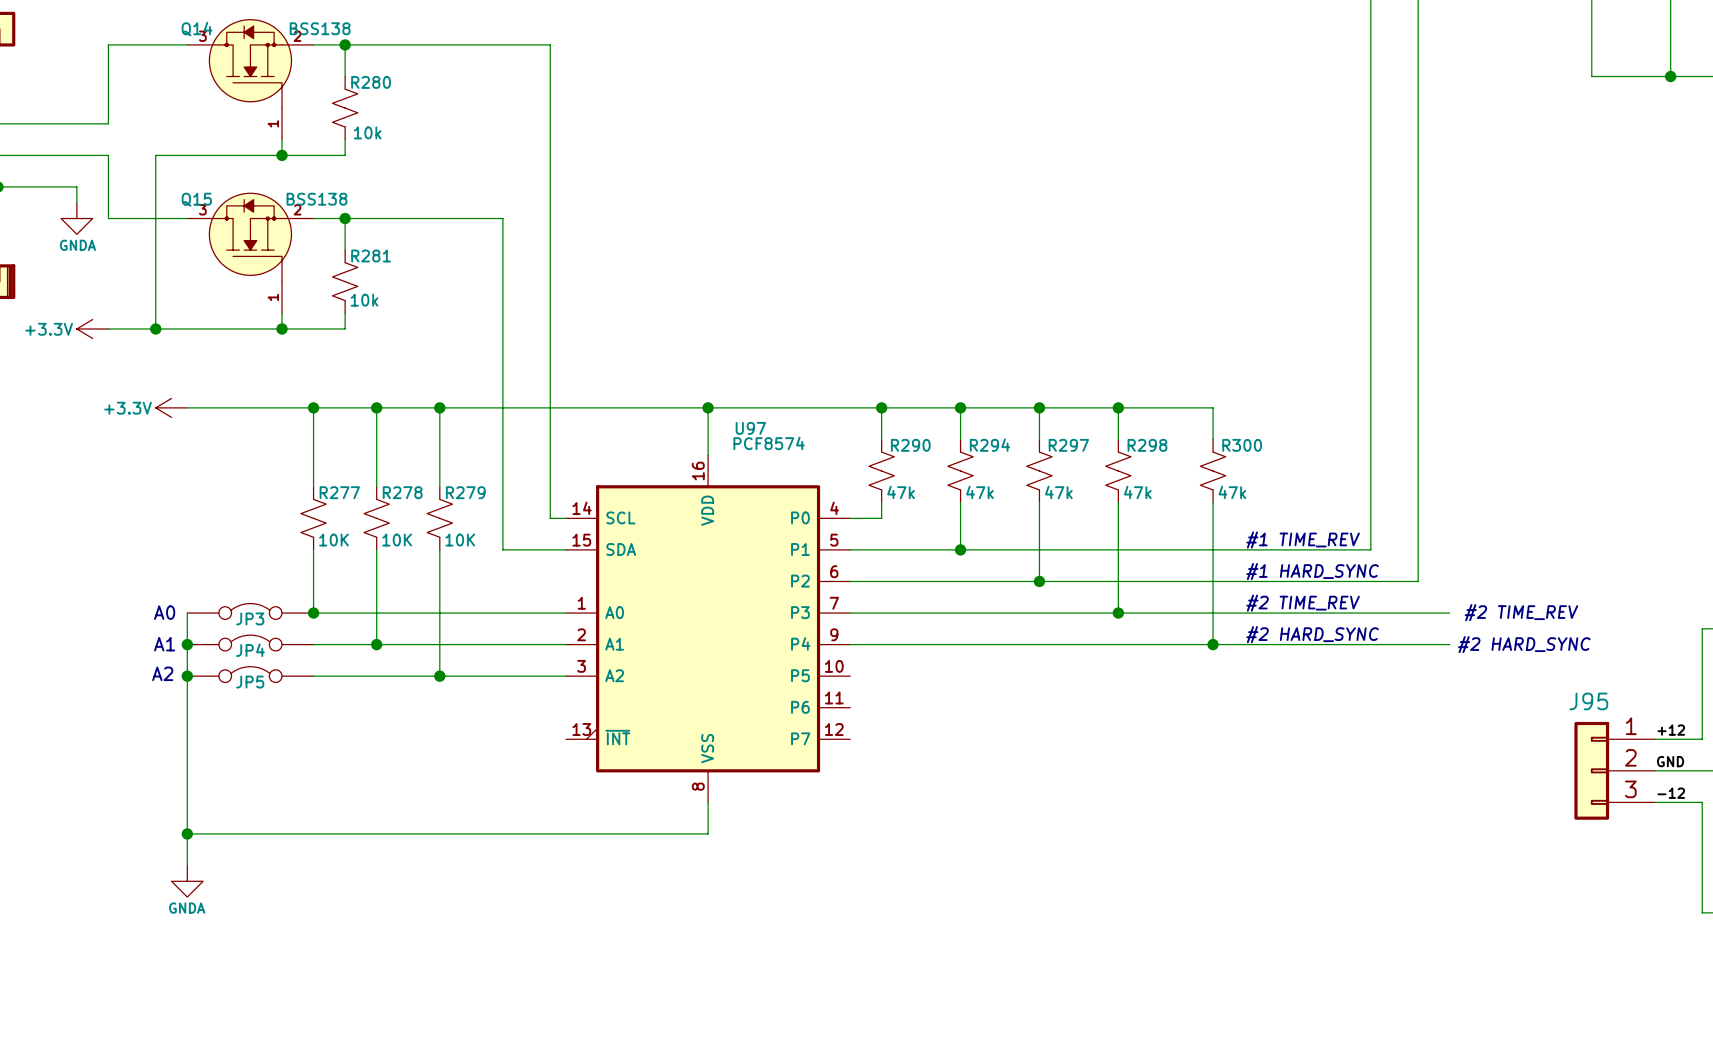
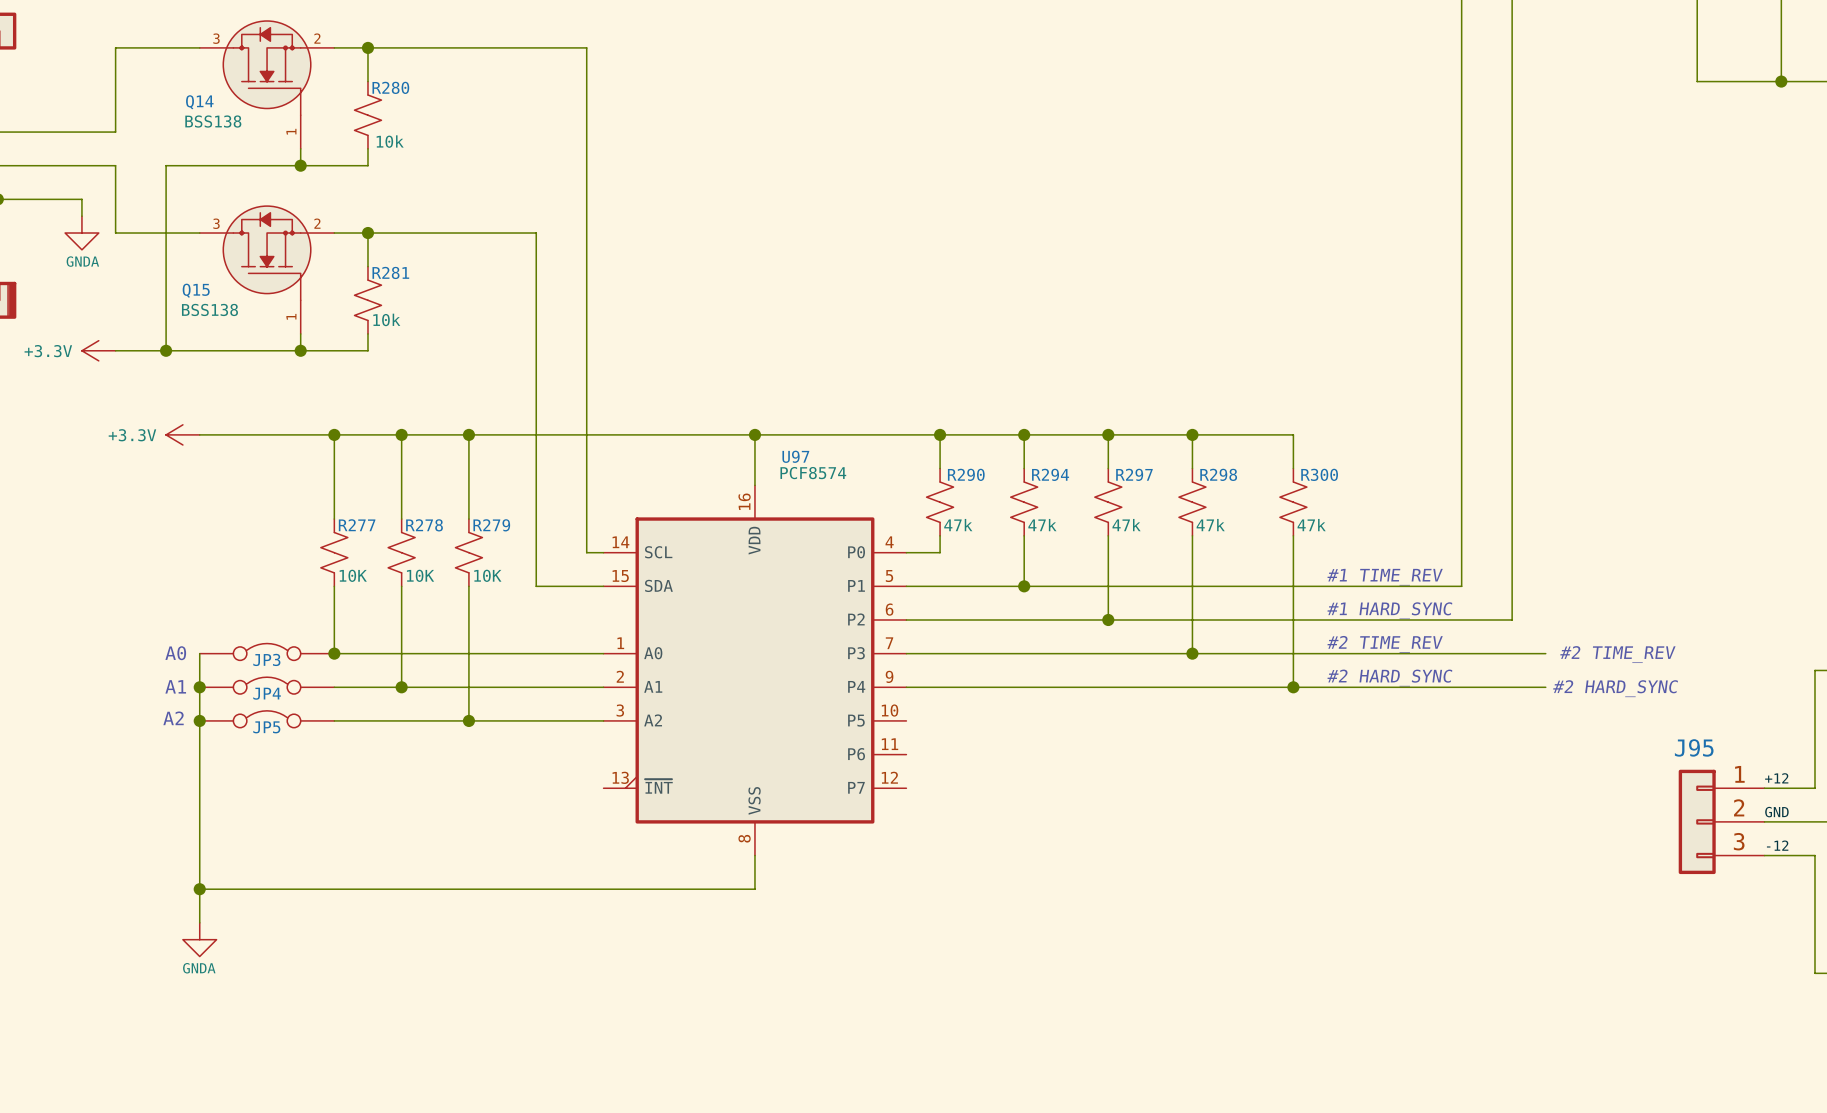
Q14 value position: BSS138 (320, 28) -> BSS138 (213, 121)
Q14 name position: Q14 (197, 29) -> Q14 (199, 102)
Q15 name position: Q15 (196, 199) -> Q15 (196, 290)
Q15 value position: BSS138 (316, 199) -> BSS138 (209, 309)

